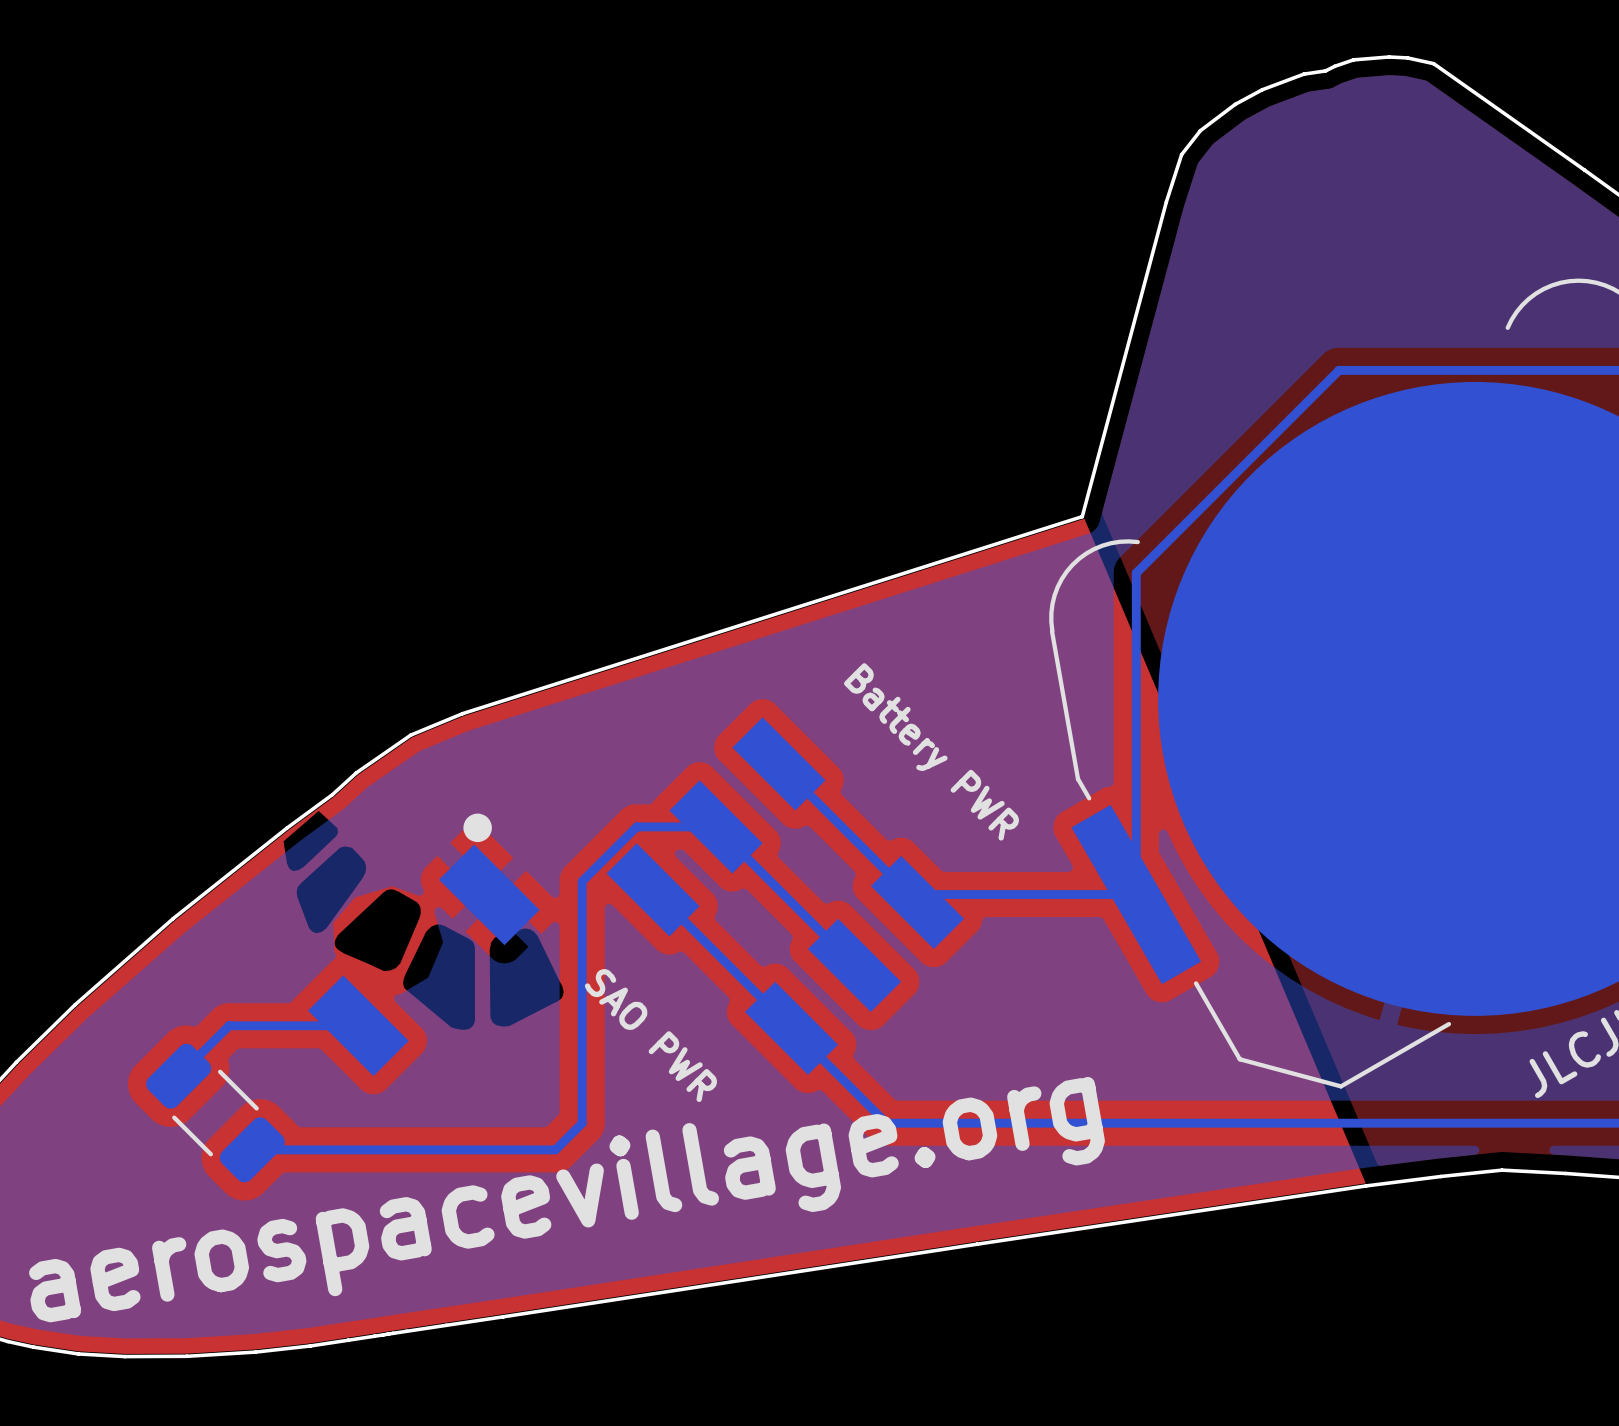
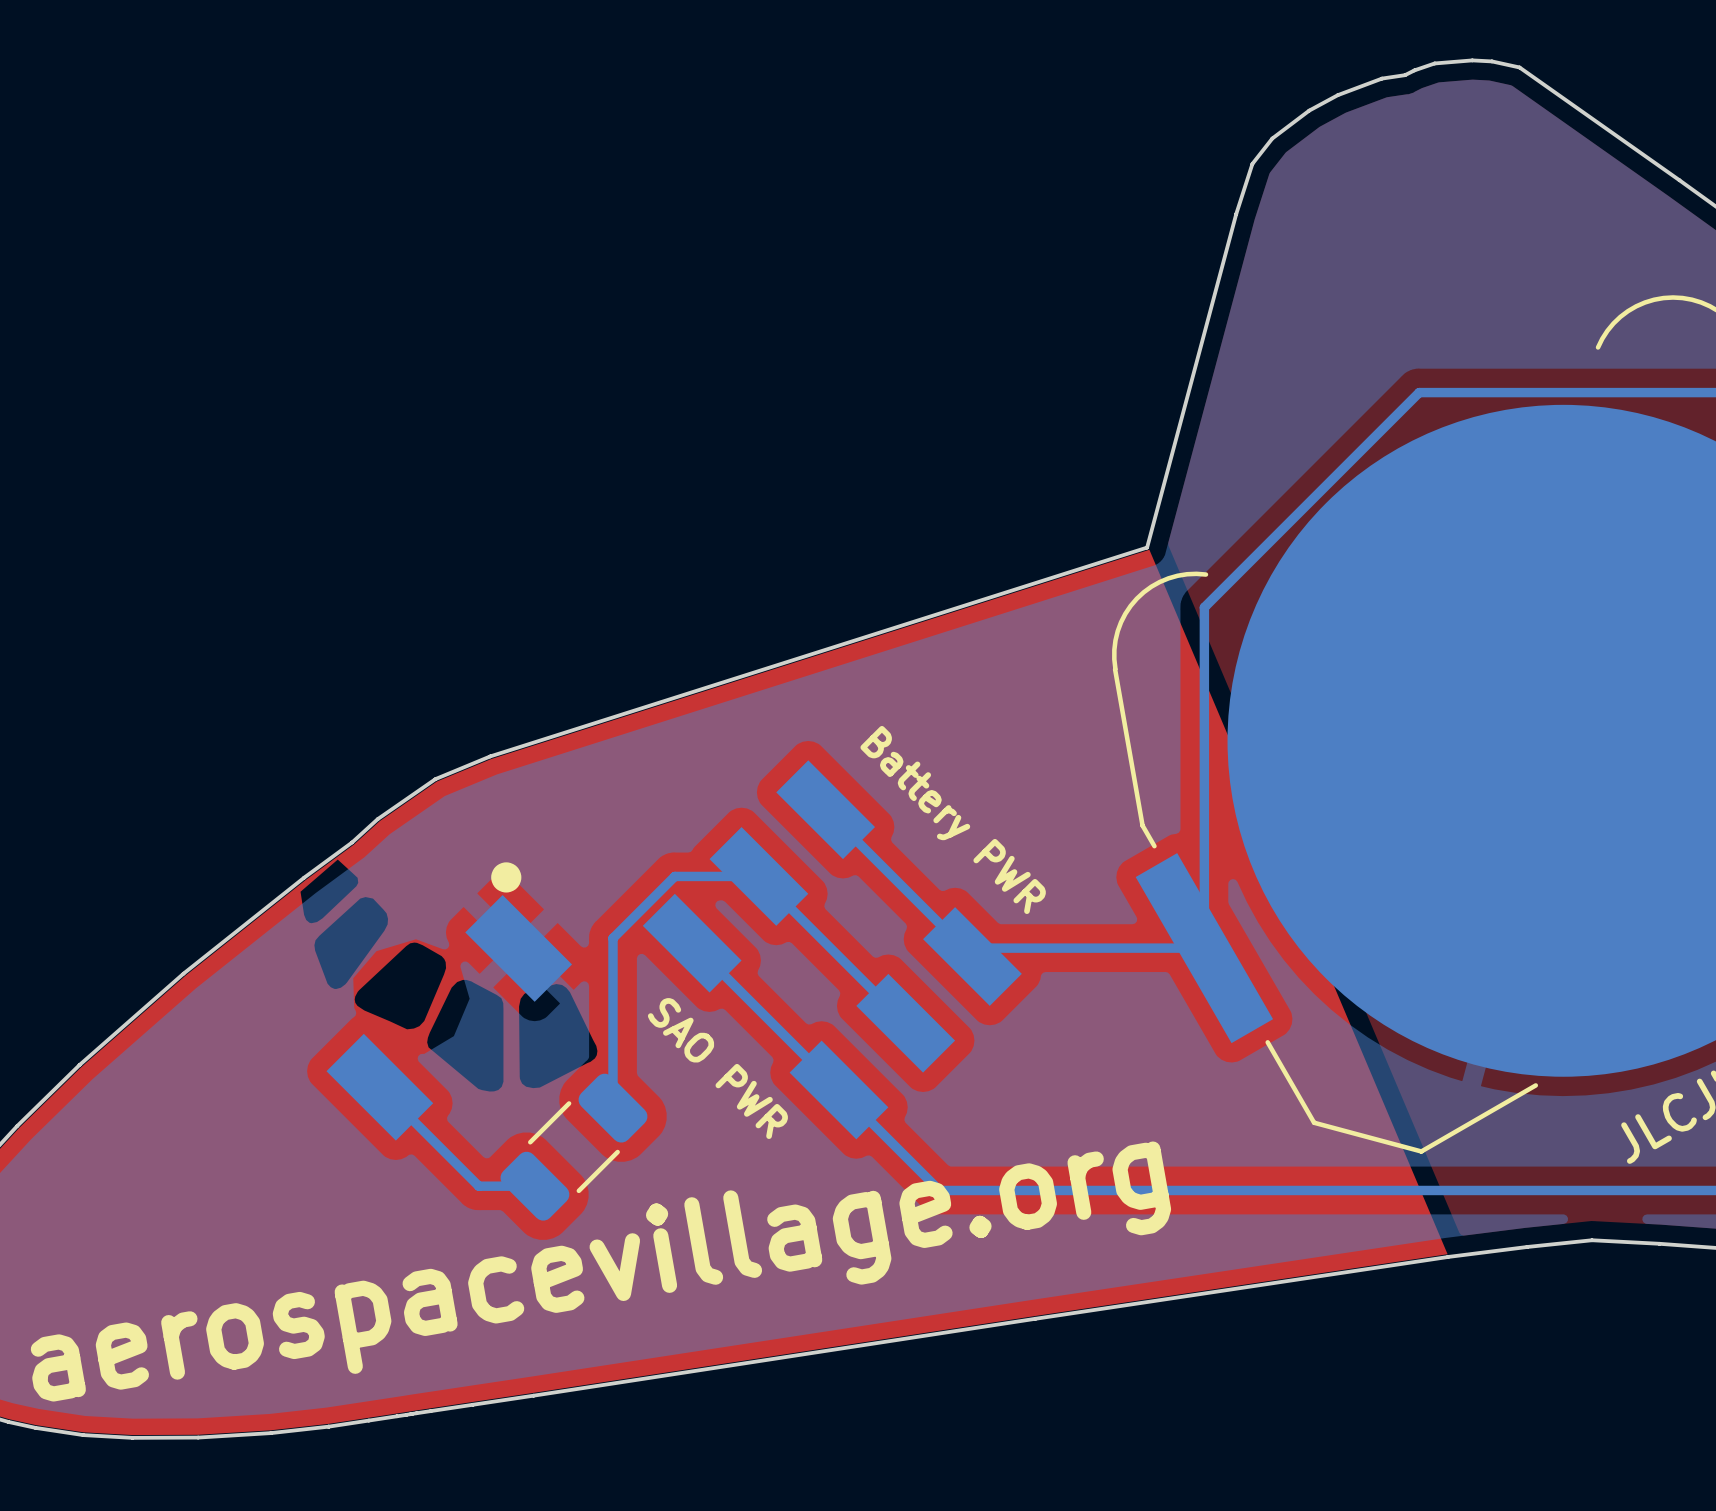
part text position: Battery PWR (931, 751) -> Battery PWR (953, 819)
bottom track: (582, 881) (582, 1123) (555, 1149) (252, 1149) -> (617, 934) (613, 938) (613, 1108)
bottom track: (358, 1025) (229, 1025) (178, 1076) -> (379, 1087) (478, 1186) (534, 1186)
part text position: SAO PWR (650, 1035) -> SAO PWR (717, 1068)
part rotation: 0° (215, 1113) -> 90° clockwise (573, 1147)
part position: (215, 1113) -> (573, 1147)

